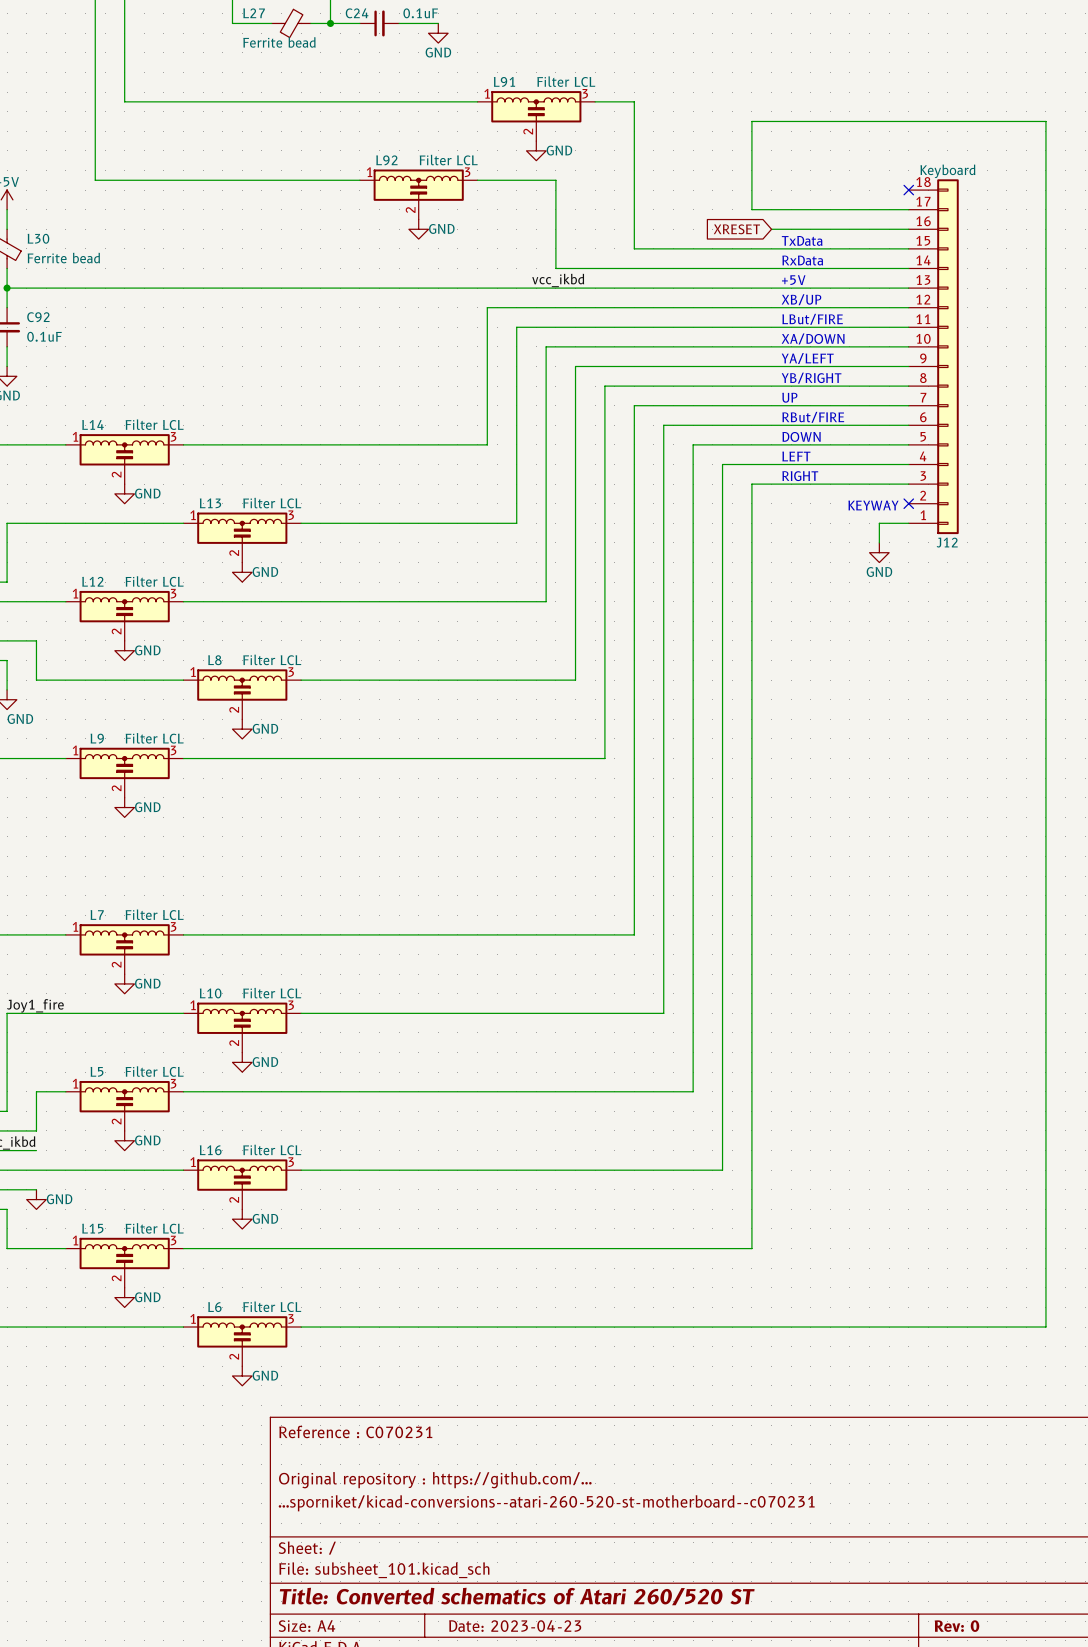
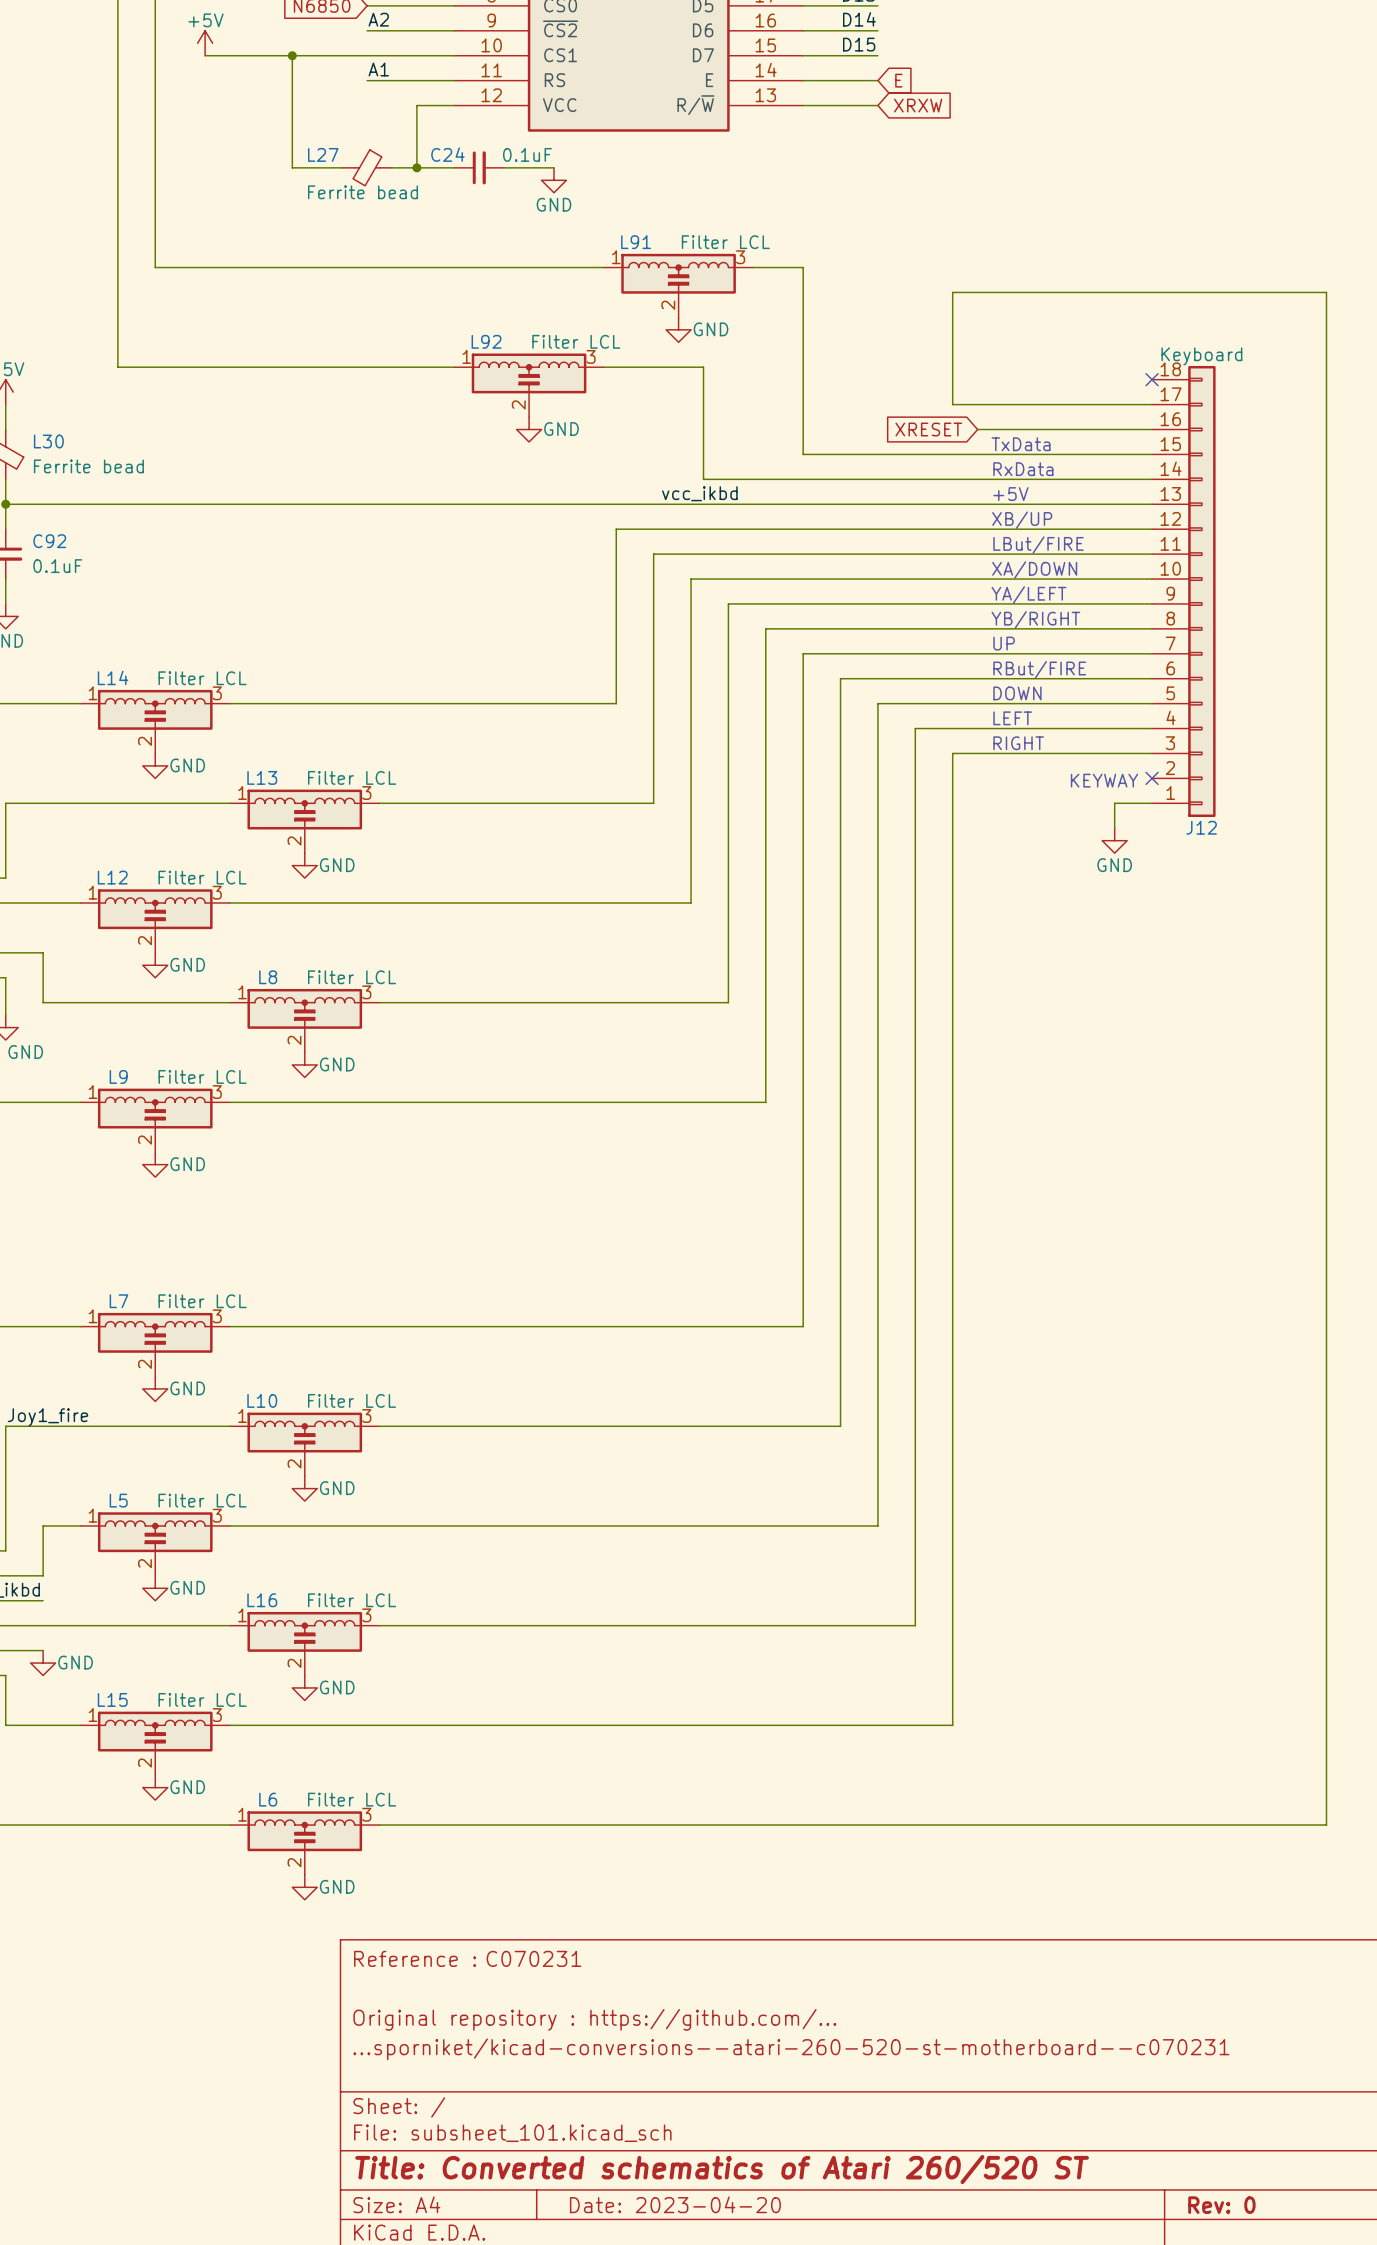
title block: Date: 2023-04-23 (515, 1626) -> Date: 2023-04-20 (675, 2204)

